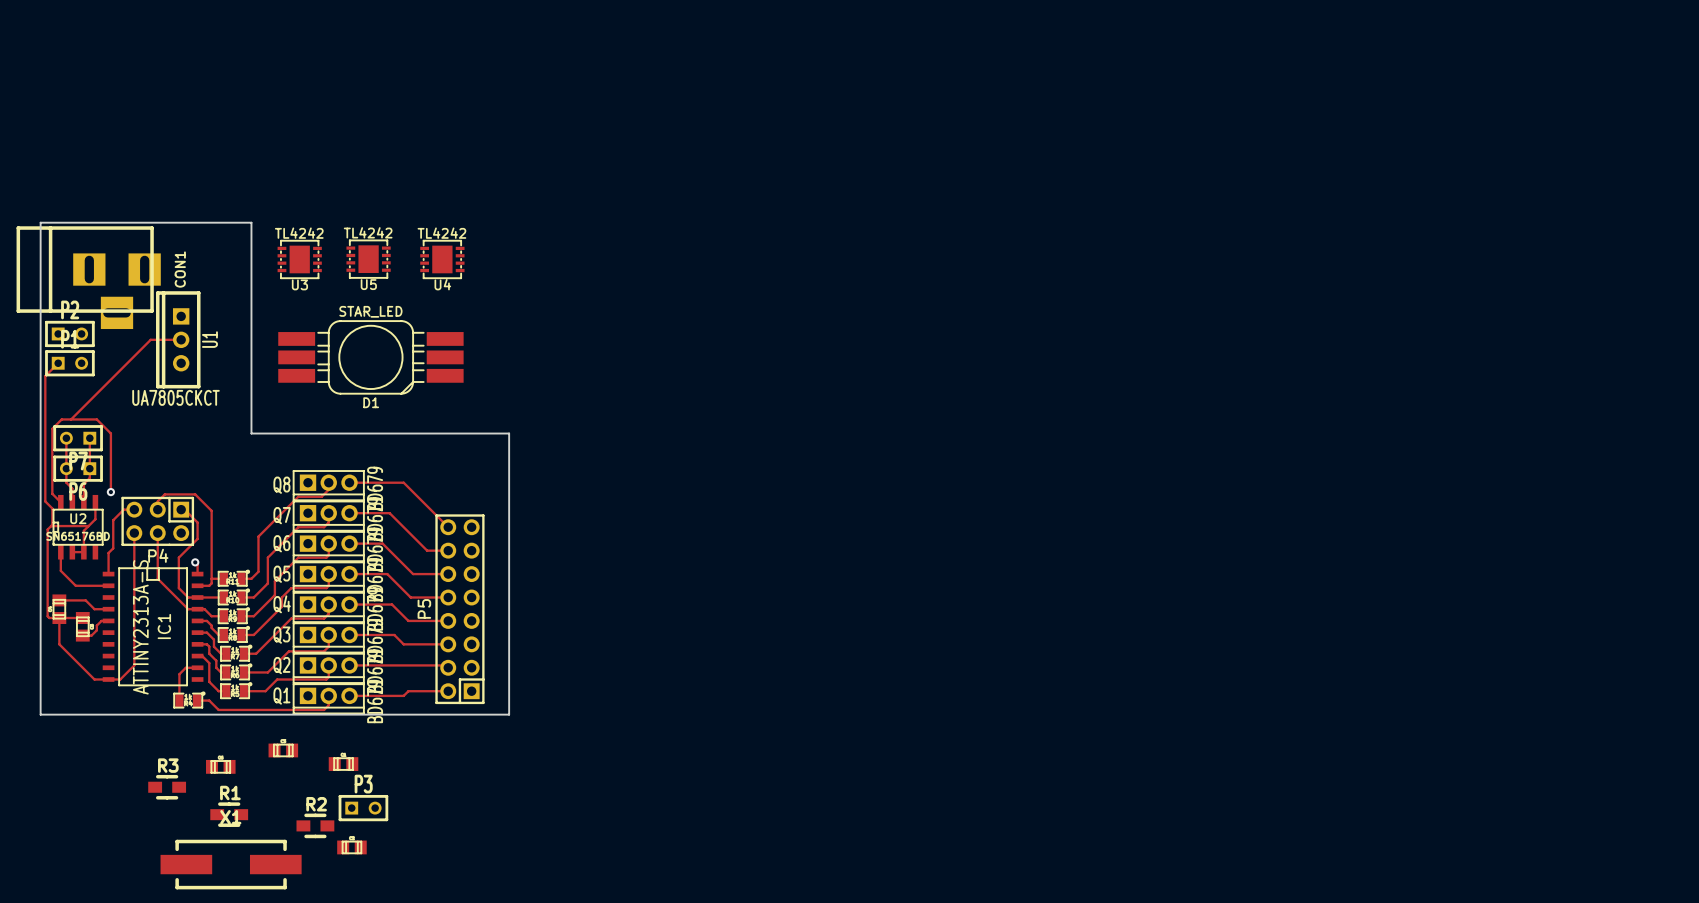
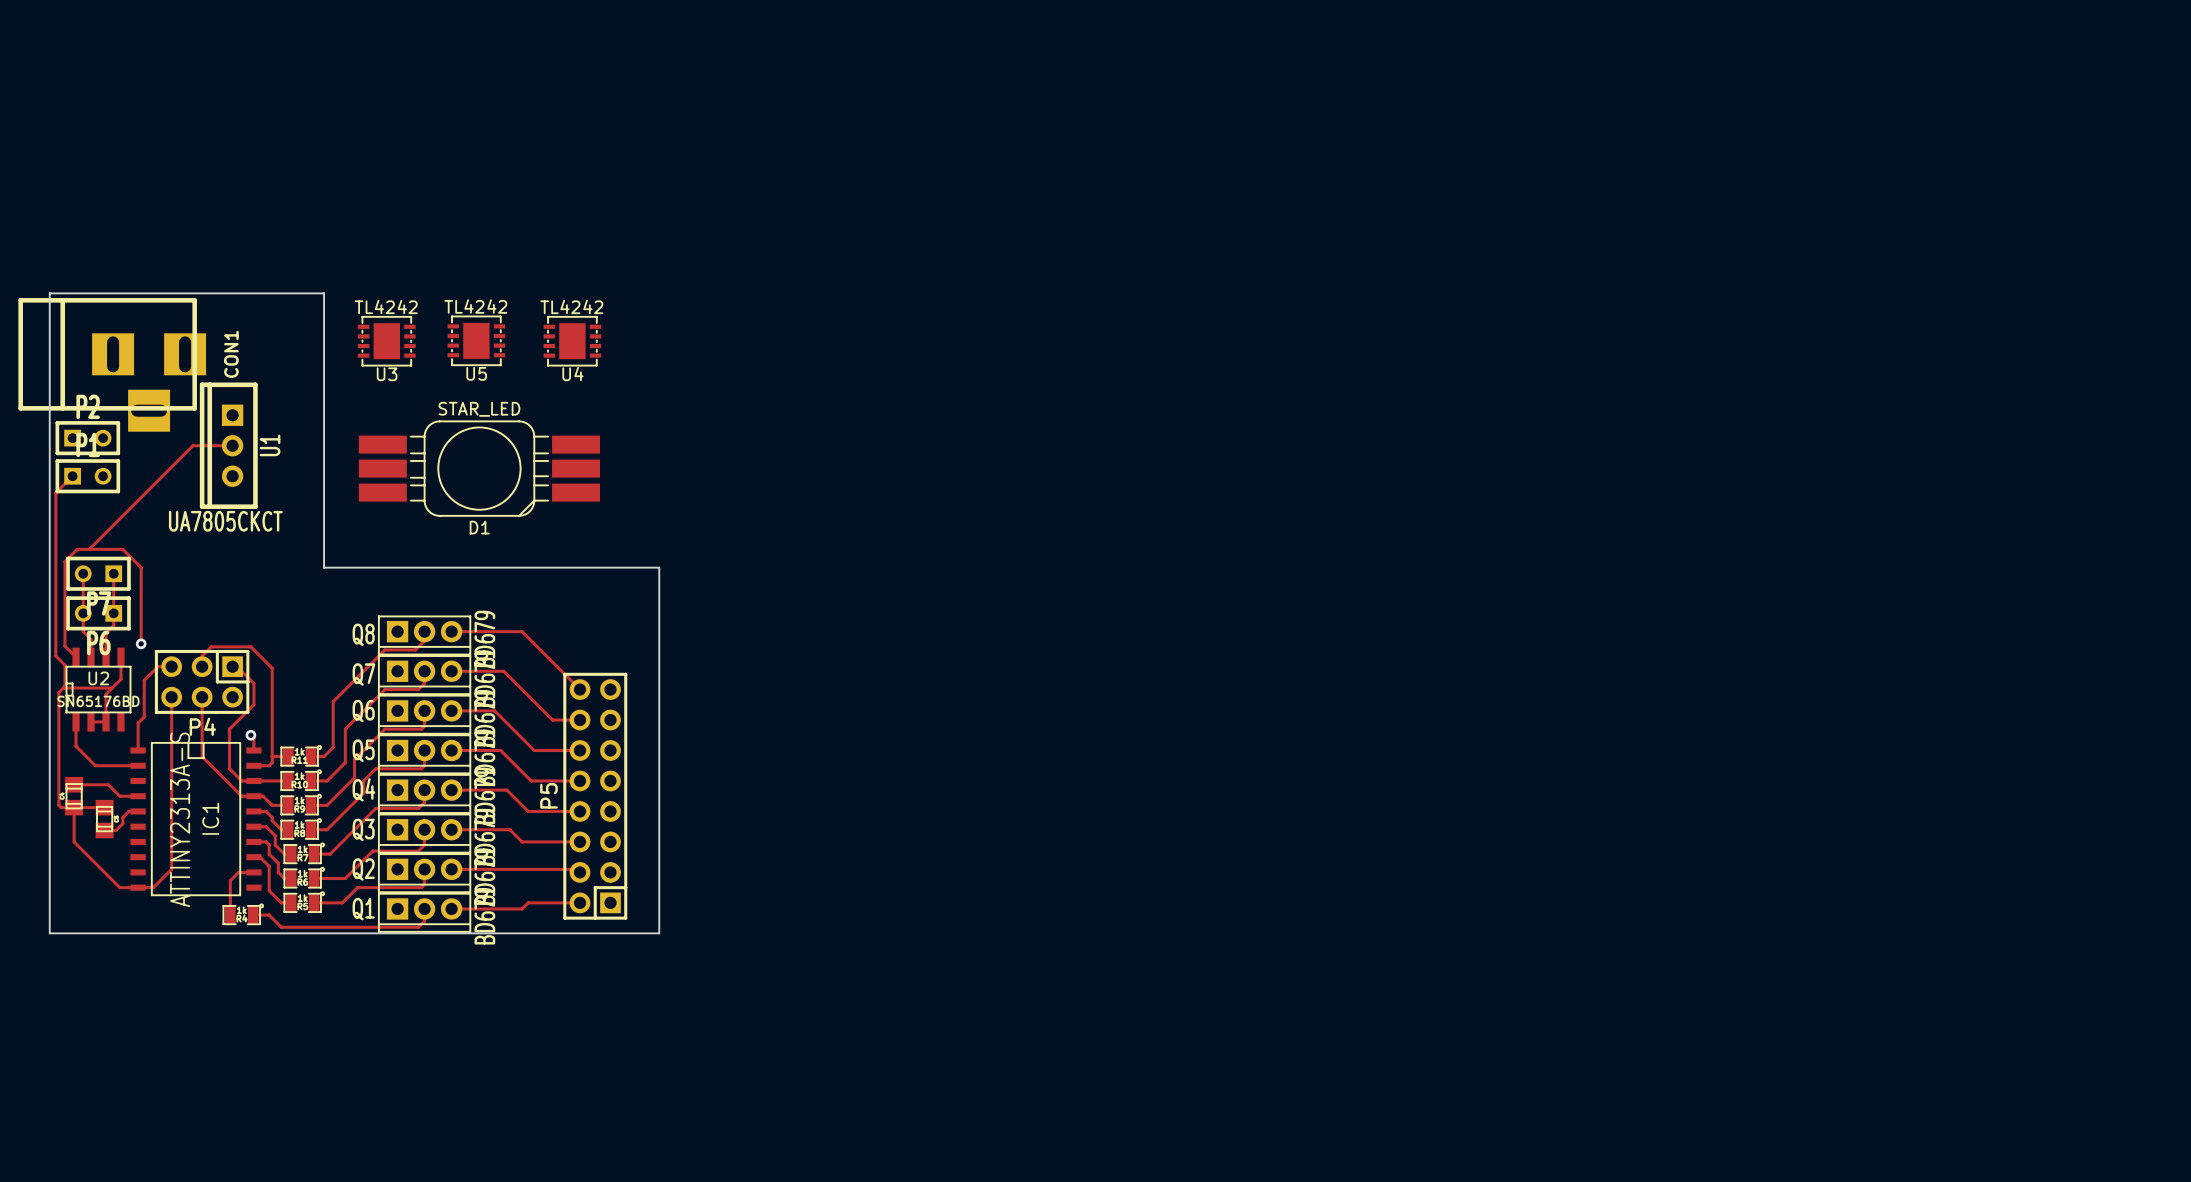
part: (283, 750) -> none
part: (343, 764) -> none
part: (220, 766) -> none
R3: (167, 787) -> none
P3: (363, 808) -> none
R1: (229, 814) -> none
R2: (315, 825) -> none
part: (351, 847) -> none
X1: (231, 864) -> none

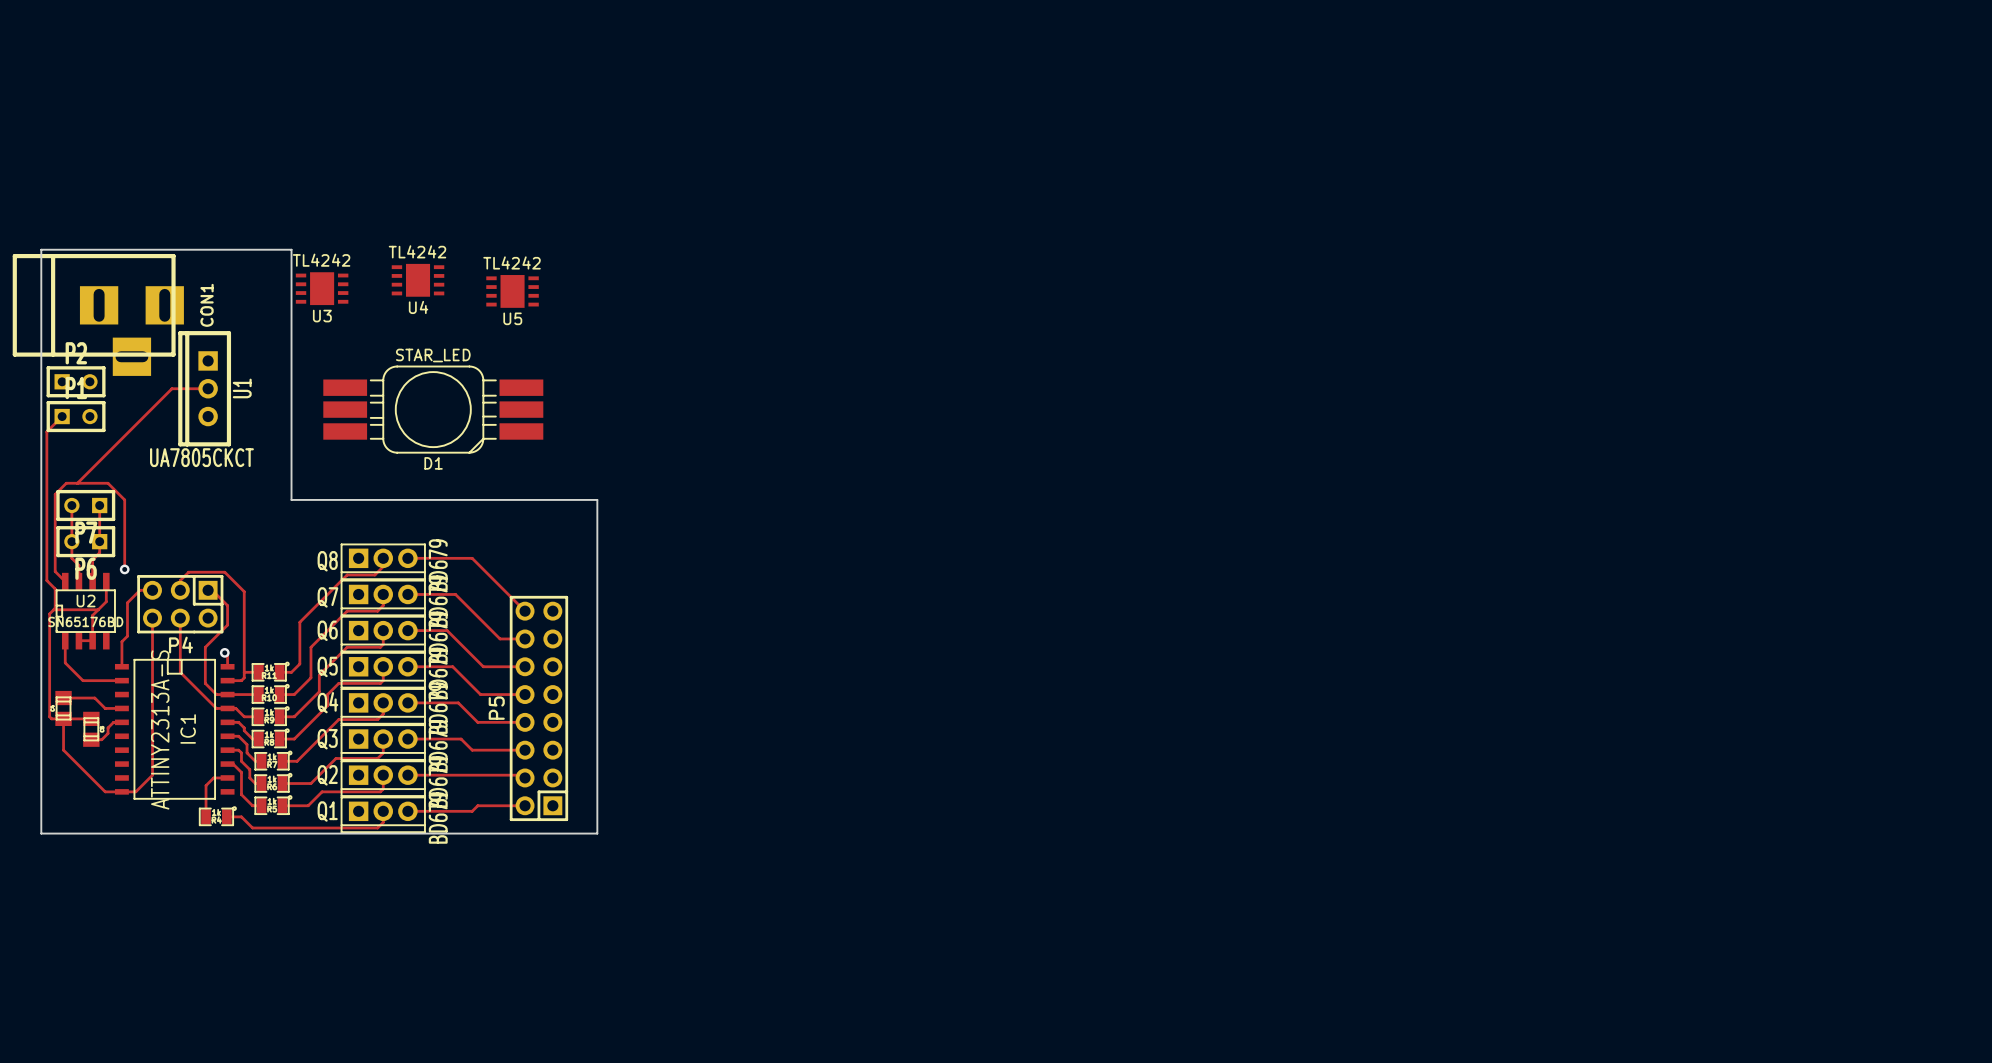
U3 footprint: [358, 315, 416, 367] -> [295, 272, 349, 306]
U5 footprint: [447, 315, 506, 367] -> [486, 275, 539, 308]
U4 footprint: [543, 315, 602, 367] -> [391, 263, 445, 297]

